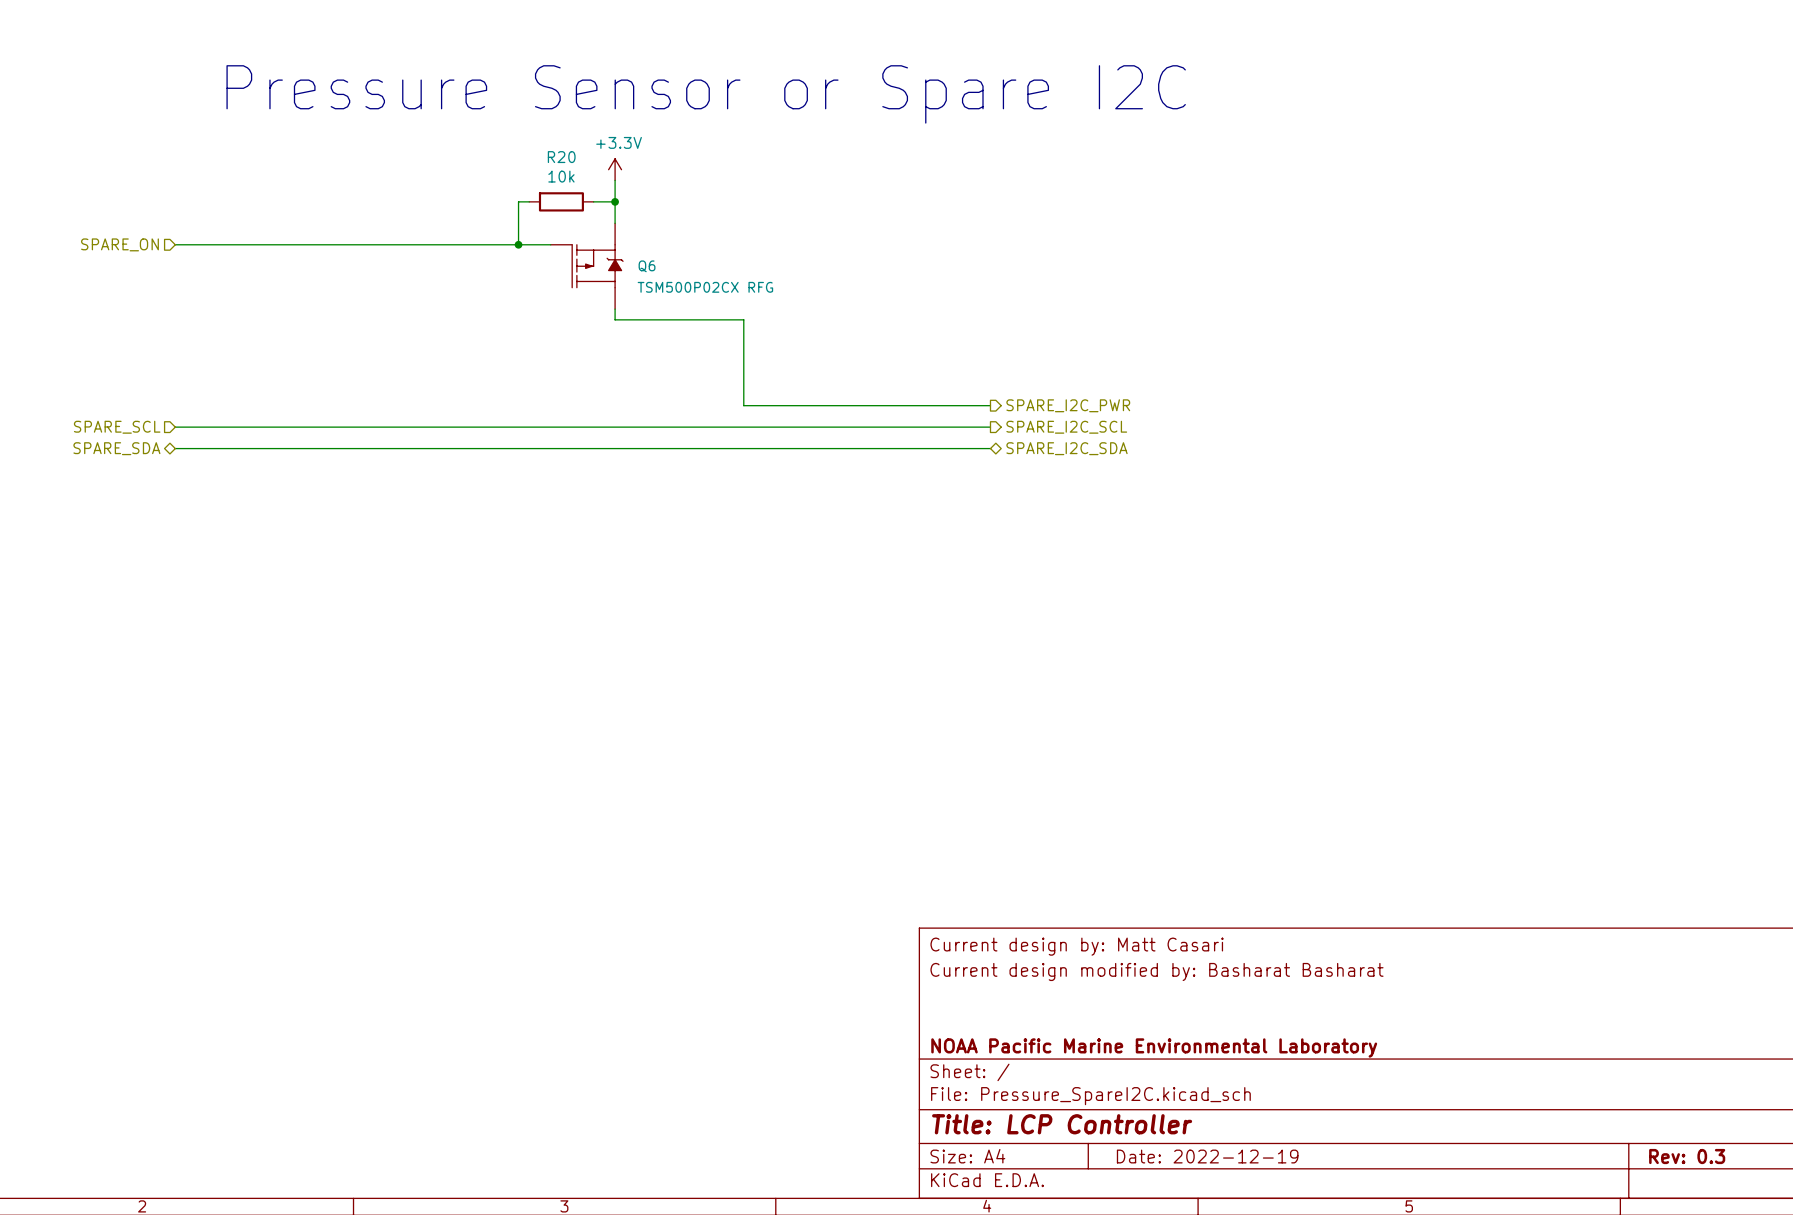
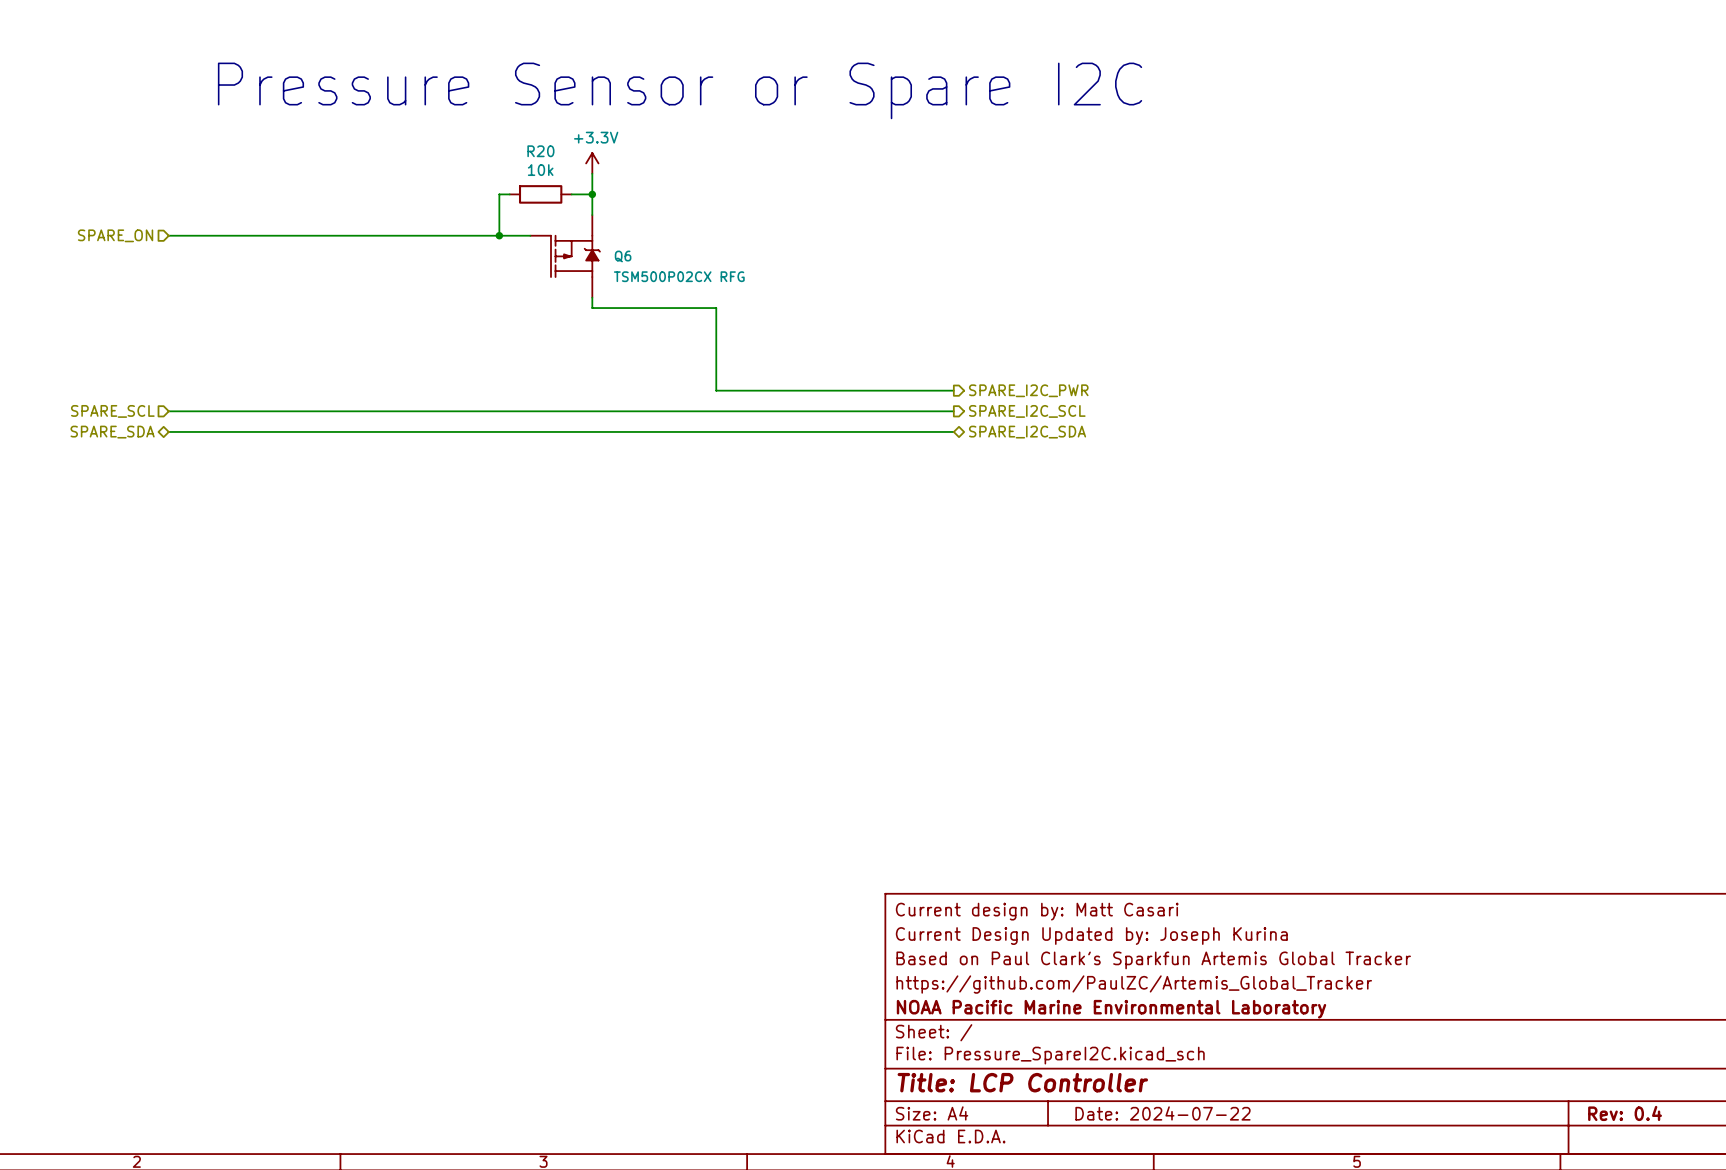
title block: Current design modified by: Basharat Basharat (1156, 971) -> Current Design Updated by: Joseph Kurina (1091, 936)
title block: none -> Based on Paul Clark's Sparkfun Artemis Global Tracker (1153, 960)
title block: none -> https://github.com/PaulZC/Artemis_Global_Tracker (1134, 984)
title block: Date: 2022-12-19 (1207, 1156) -> Date: 2024-07-22 (1162, 1113)
title block: Rev: 0.3 (1687, 1156) -> Rev: 0.4 (1625, 1113)

